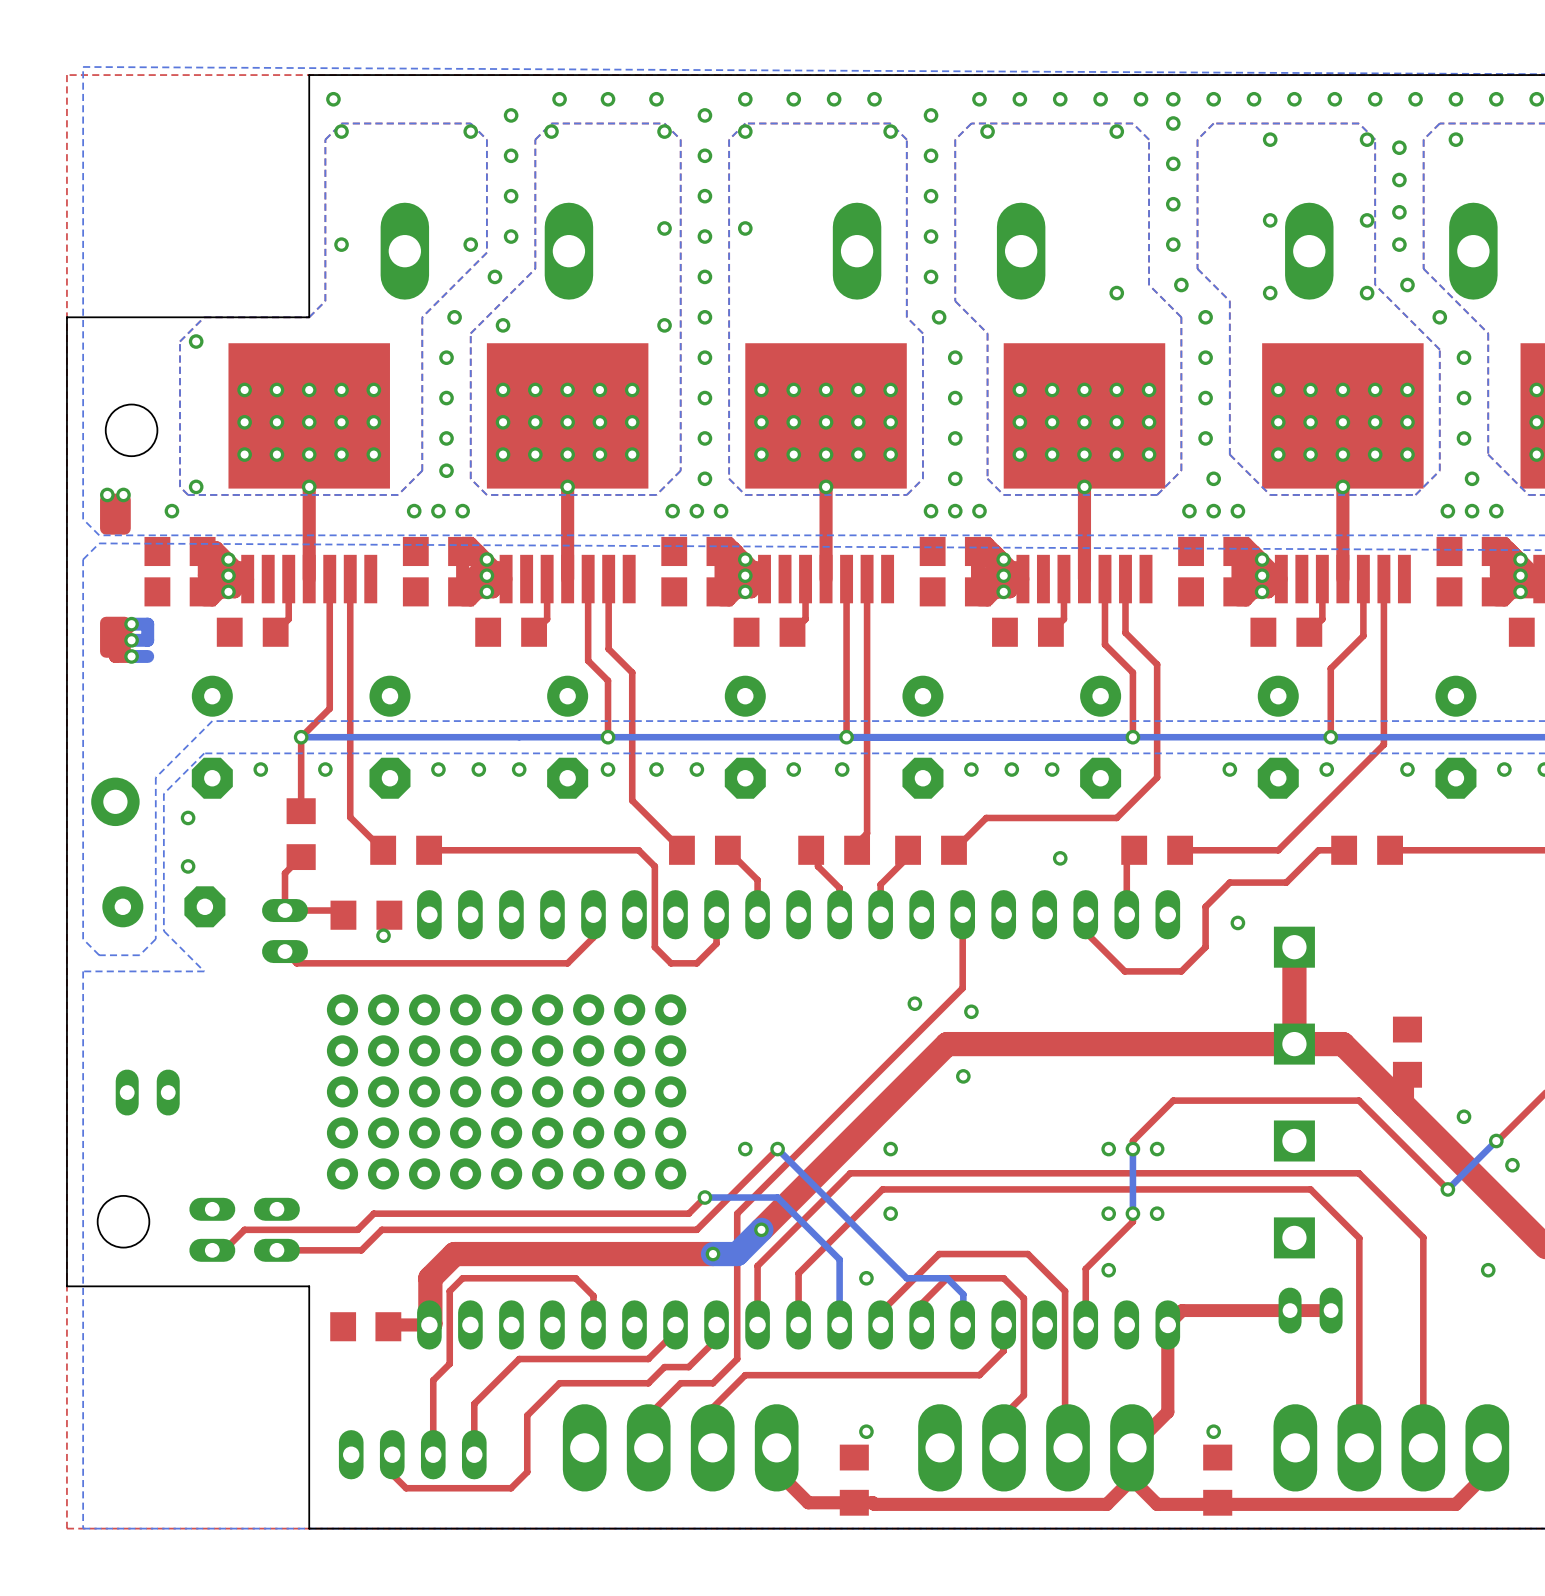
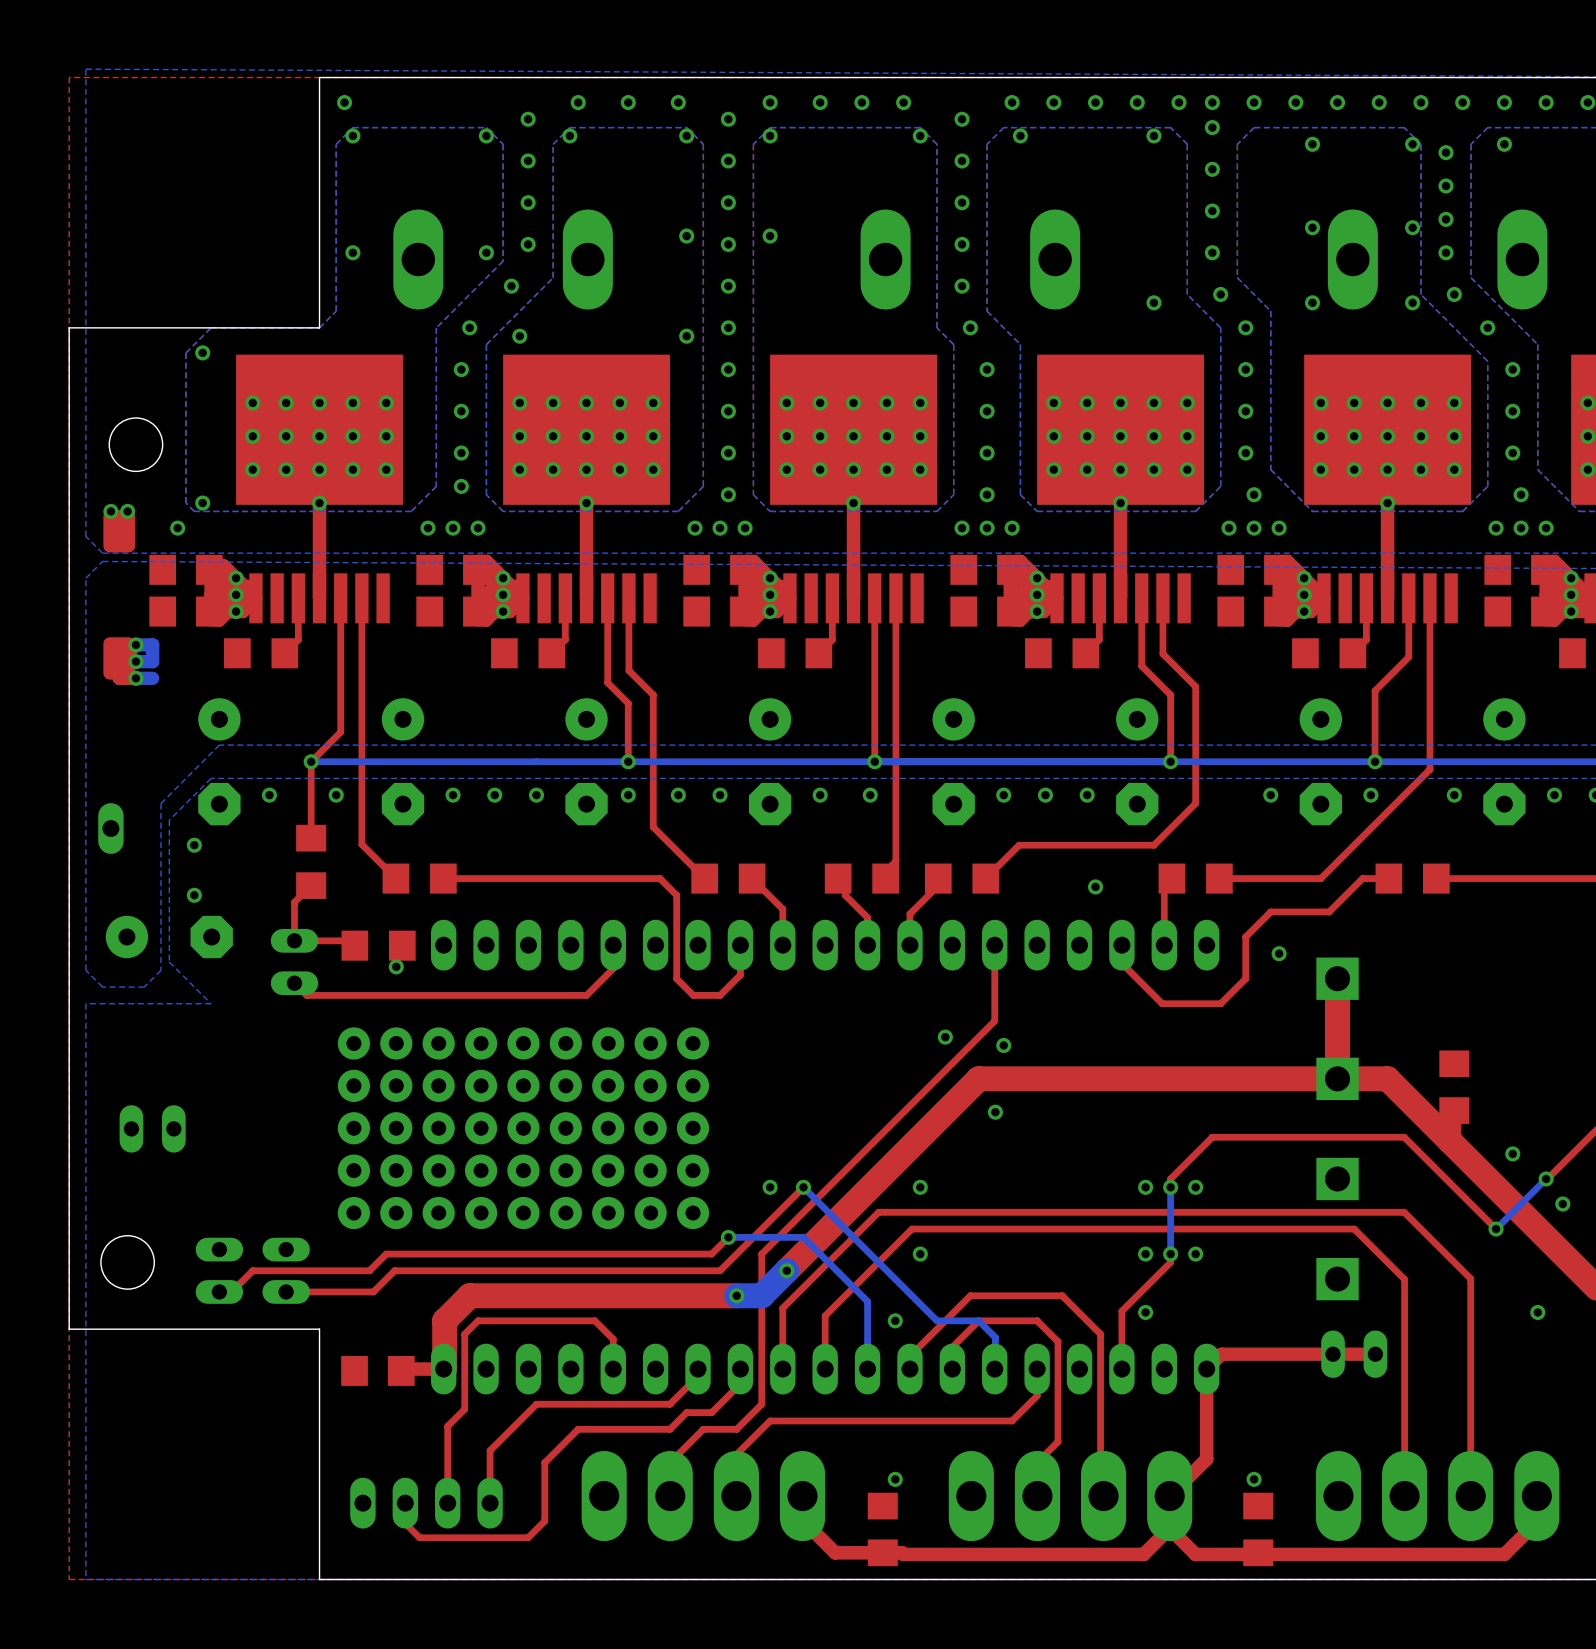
part: none -> (110, 828)
via: (115, 801) -> none

